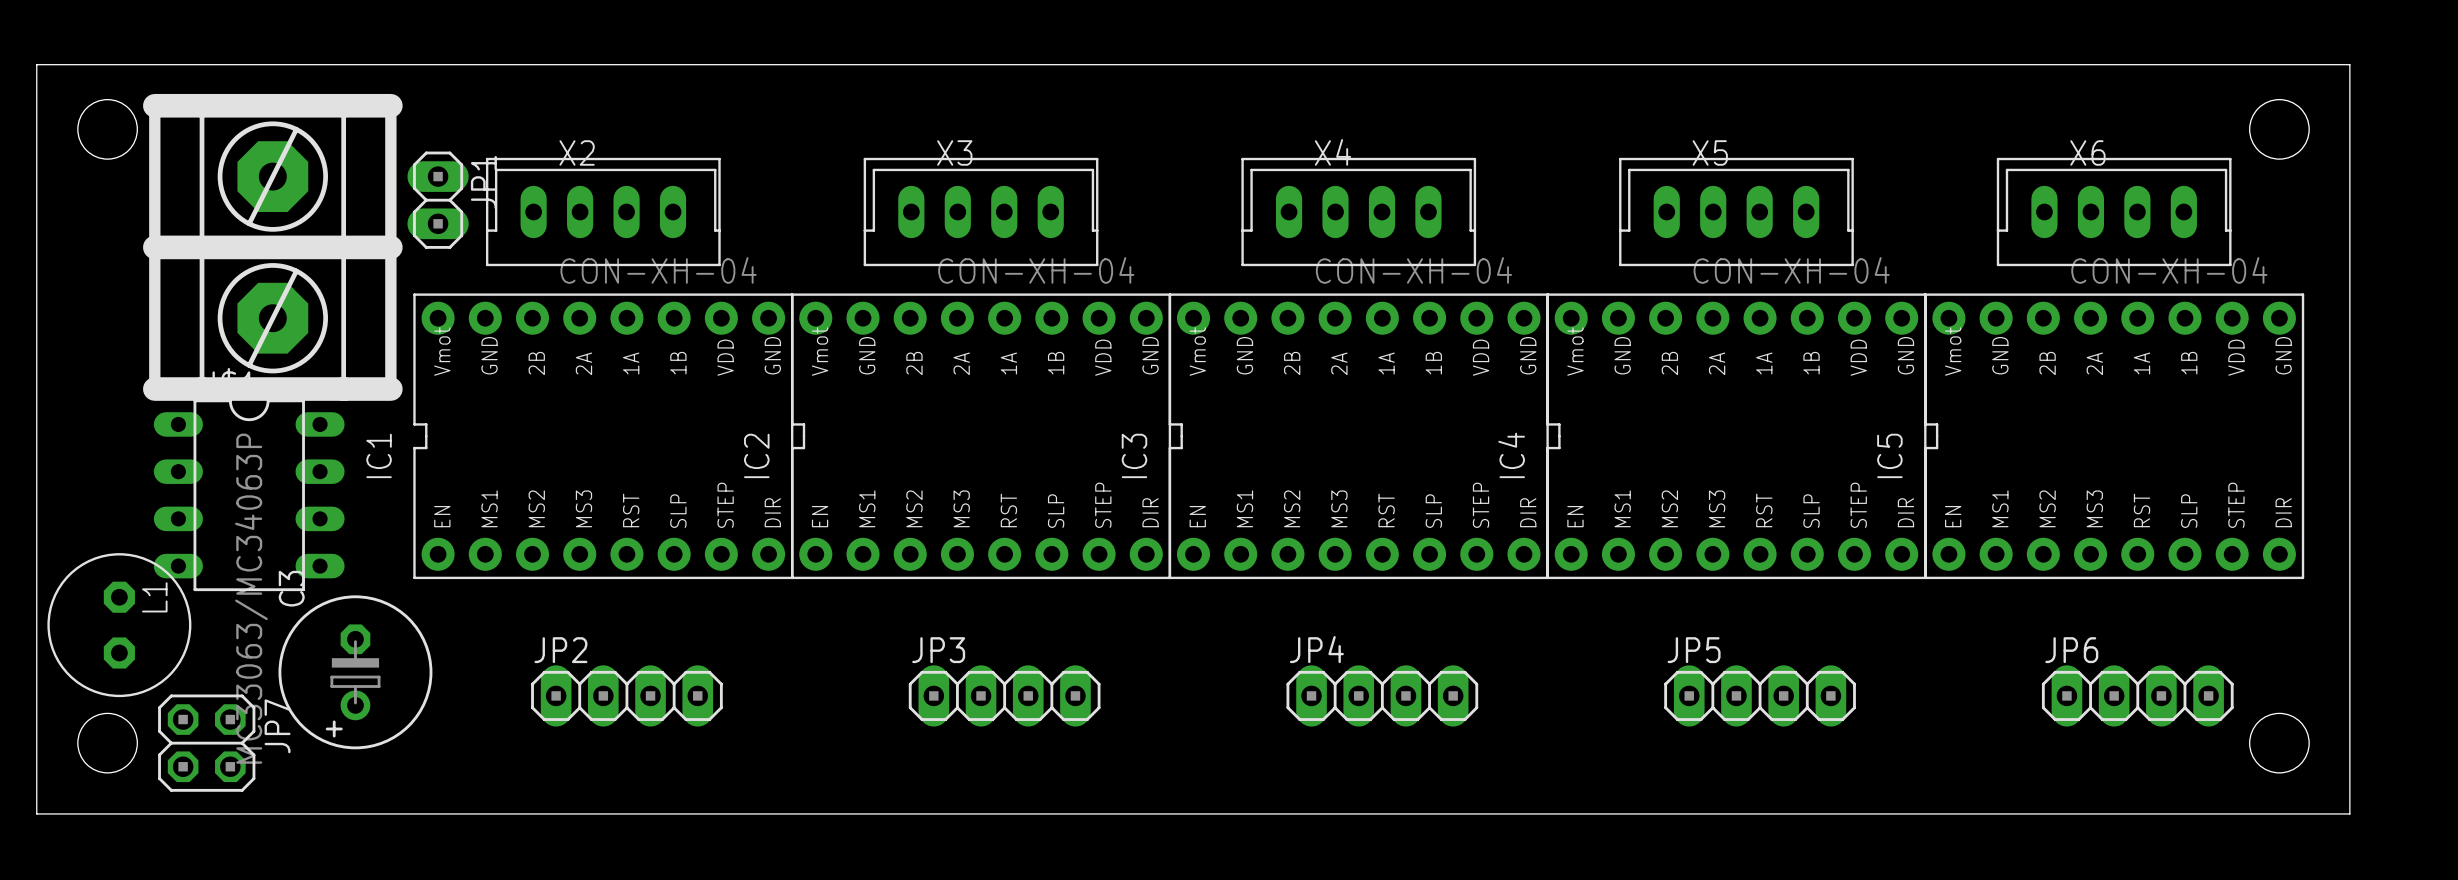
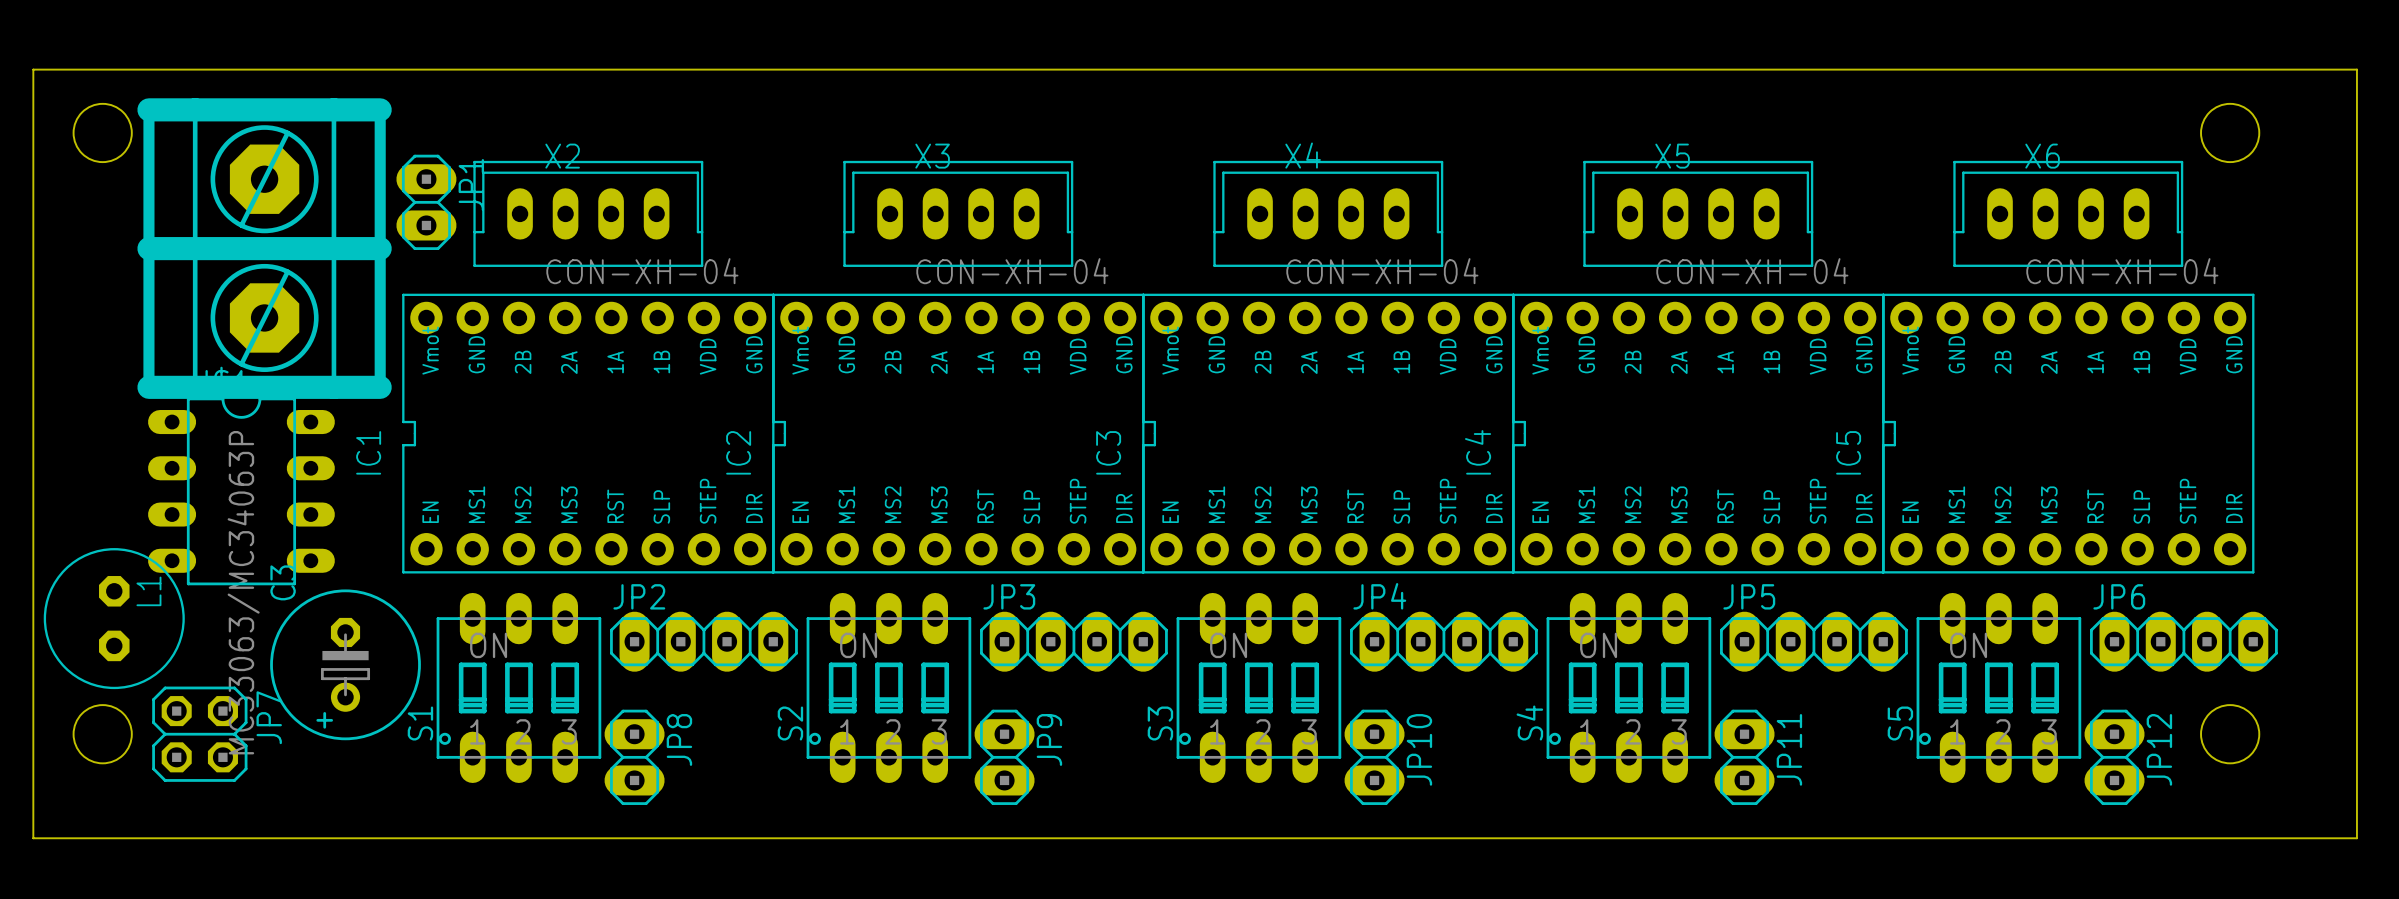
board edge: (2349, 64) (2349, 813) (36, 813) -> (2299, 69) (2356, 69) (2356, 838) (33, 838) (33, 803)
S1: none -> (518, 687)
JP2 position: (626, 695) -> (703, 641)
S2: none -> (888, 687)
JP3 position: (1004, 695) -> (1073, 641)
S3: none -> (1258, 687)
JP4 position: (1382, 695) -> (1443, 641)
S4: none -> (1628, 687)
JP5 position: (1760, 695) -> (1813, 641)
S5: none -> (1998, 687)
JP6 position: (2137, 695) -> (2183, 641)
JP8: none -> (634, 757)
JP9: none -> (1004, 757)
JP10: none -> (1374, 757)
JP11: none -> (1744, 757)
JP12: none -> (2114, 757)

